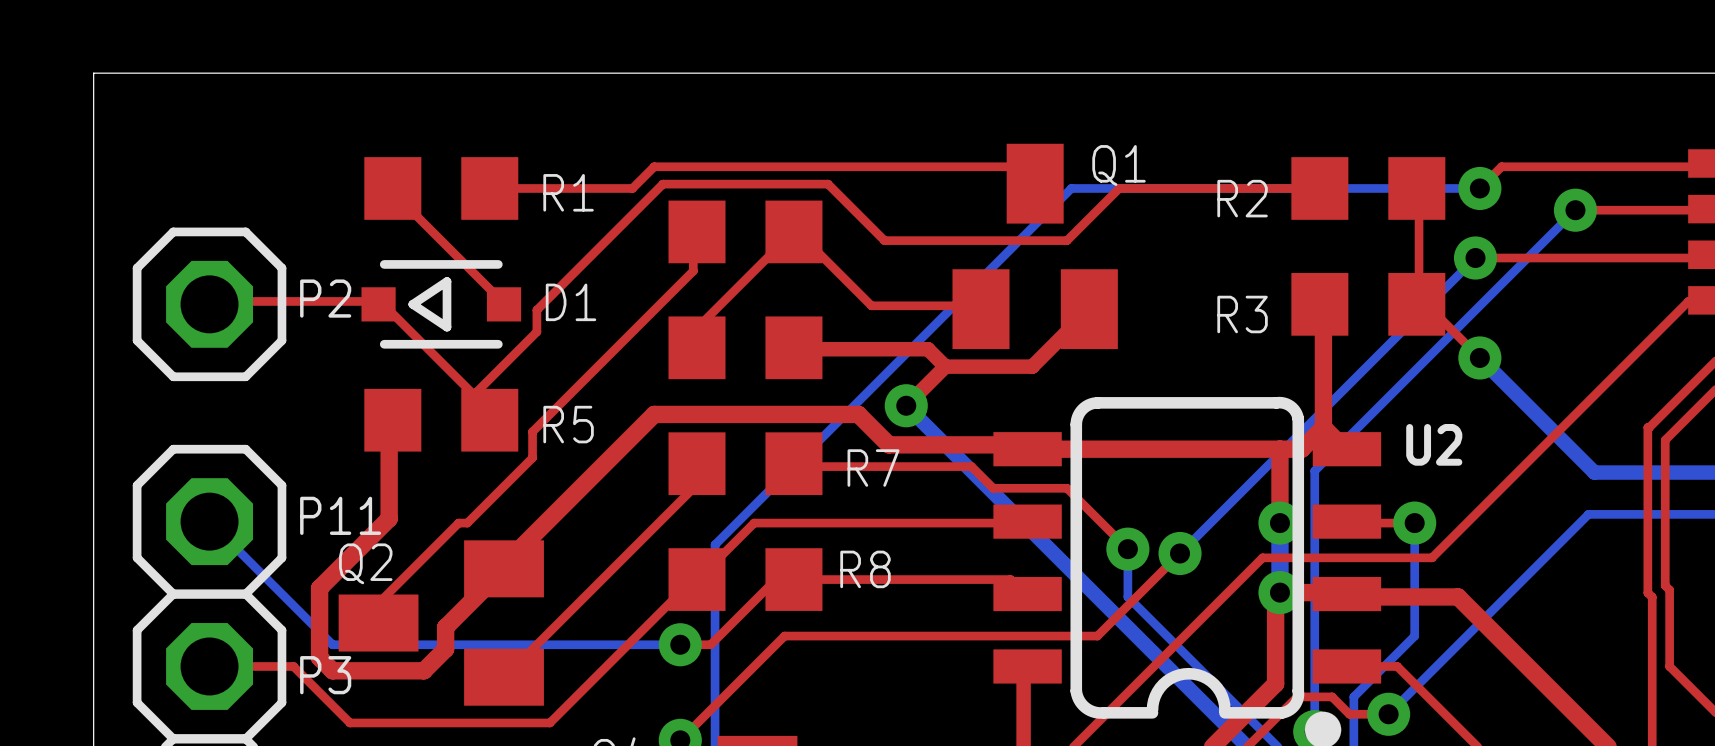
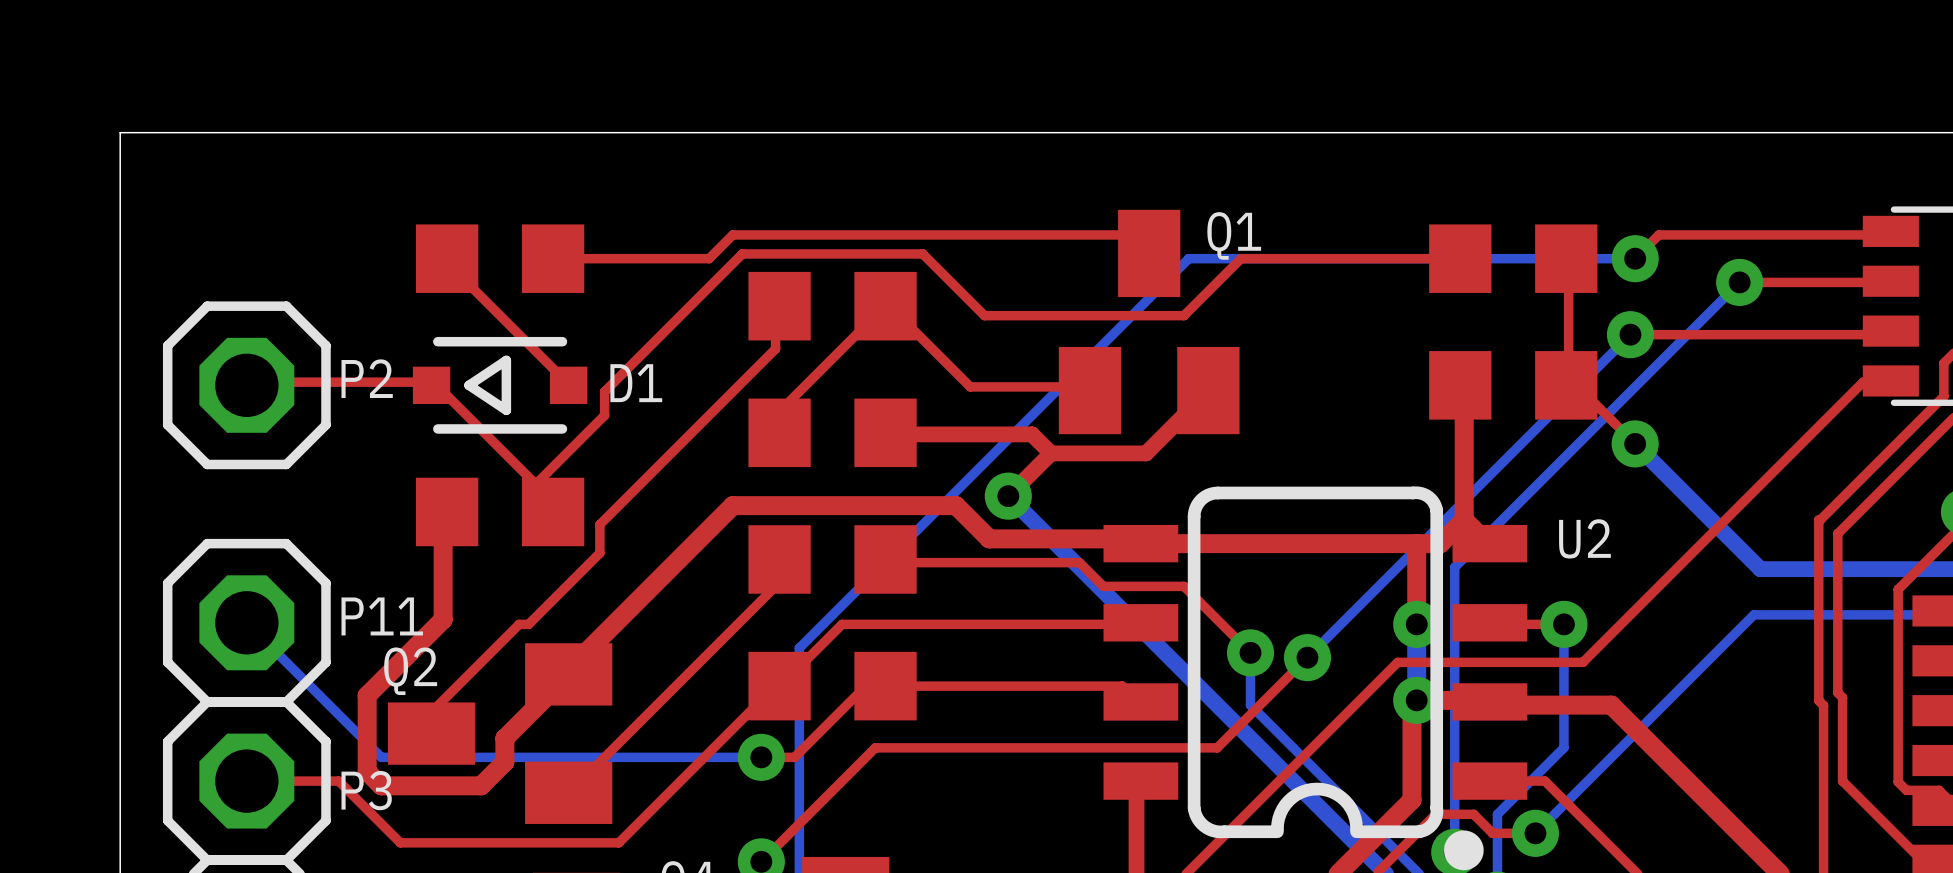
R1 name: R1 (568, 192) -> none
R2 name: R2 (1242, 198) -> none
R3 name: R3 (1242, 314) -> none
R5 name: R5 (568, 424) -> none
R7 name: R7 (873, 468) -> none
R8 name: R8 (865, 569) -> none

